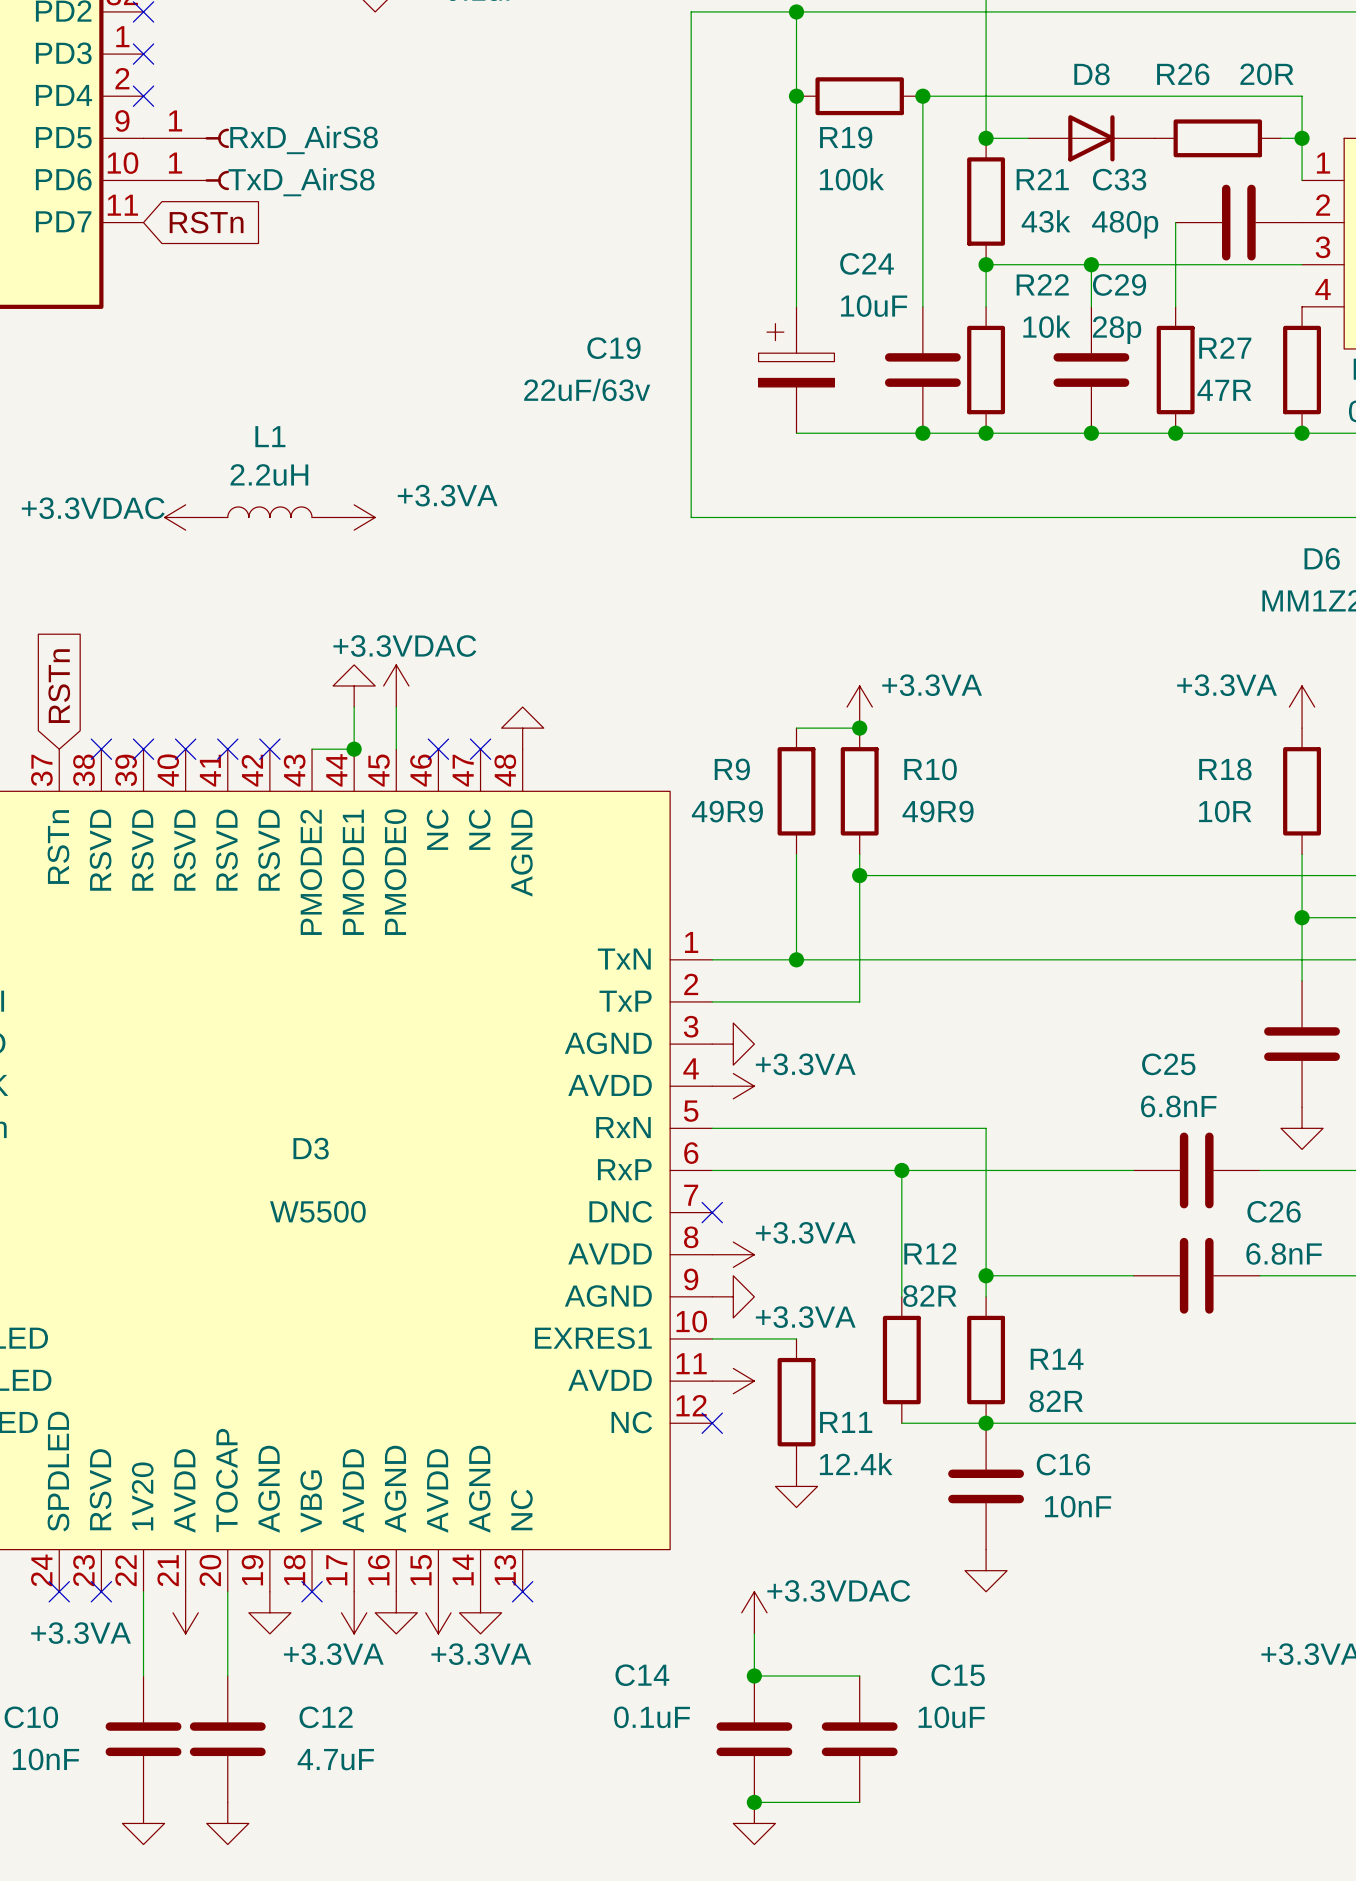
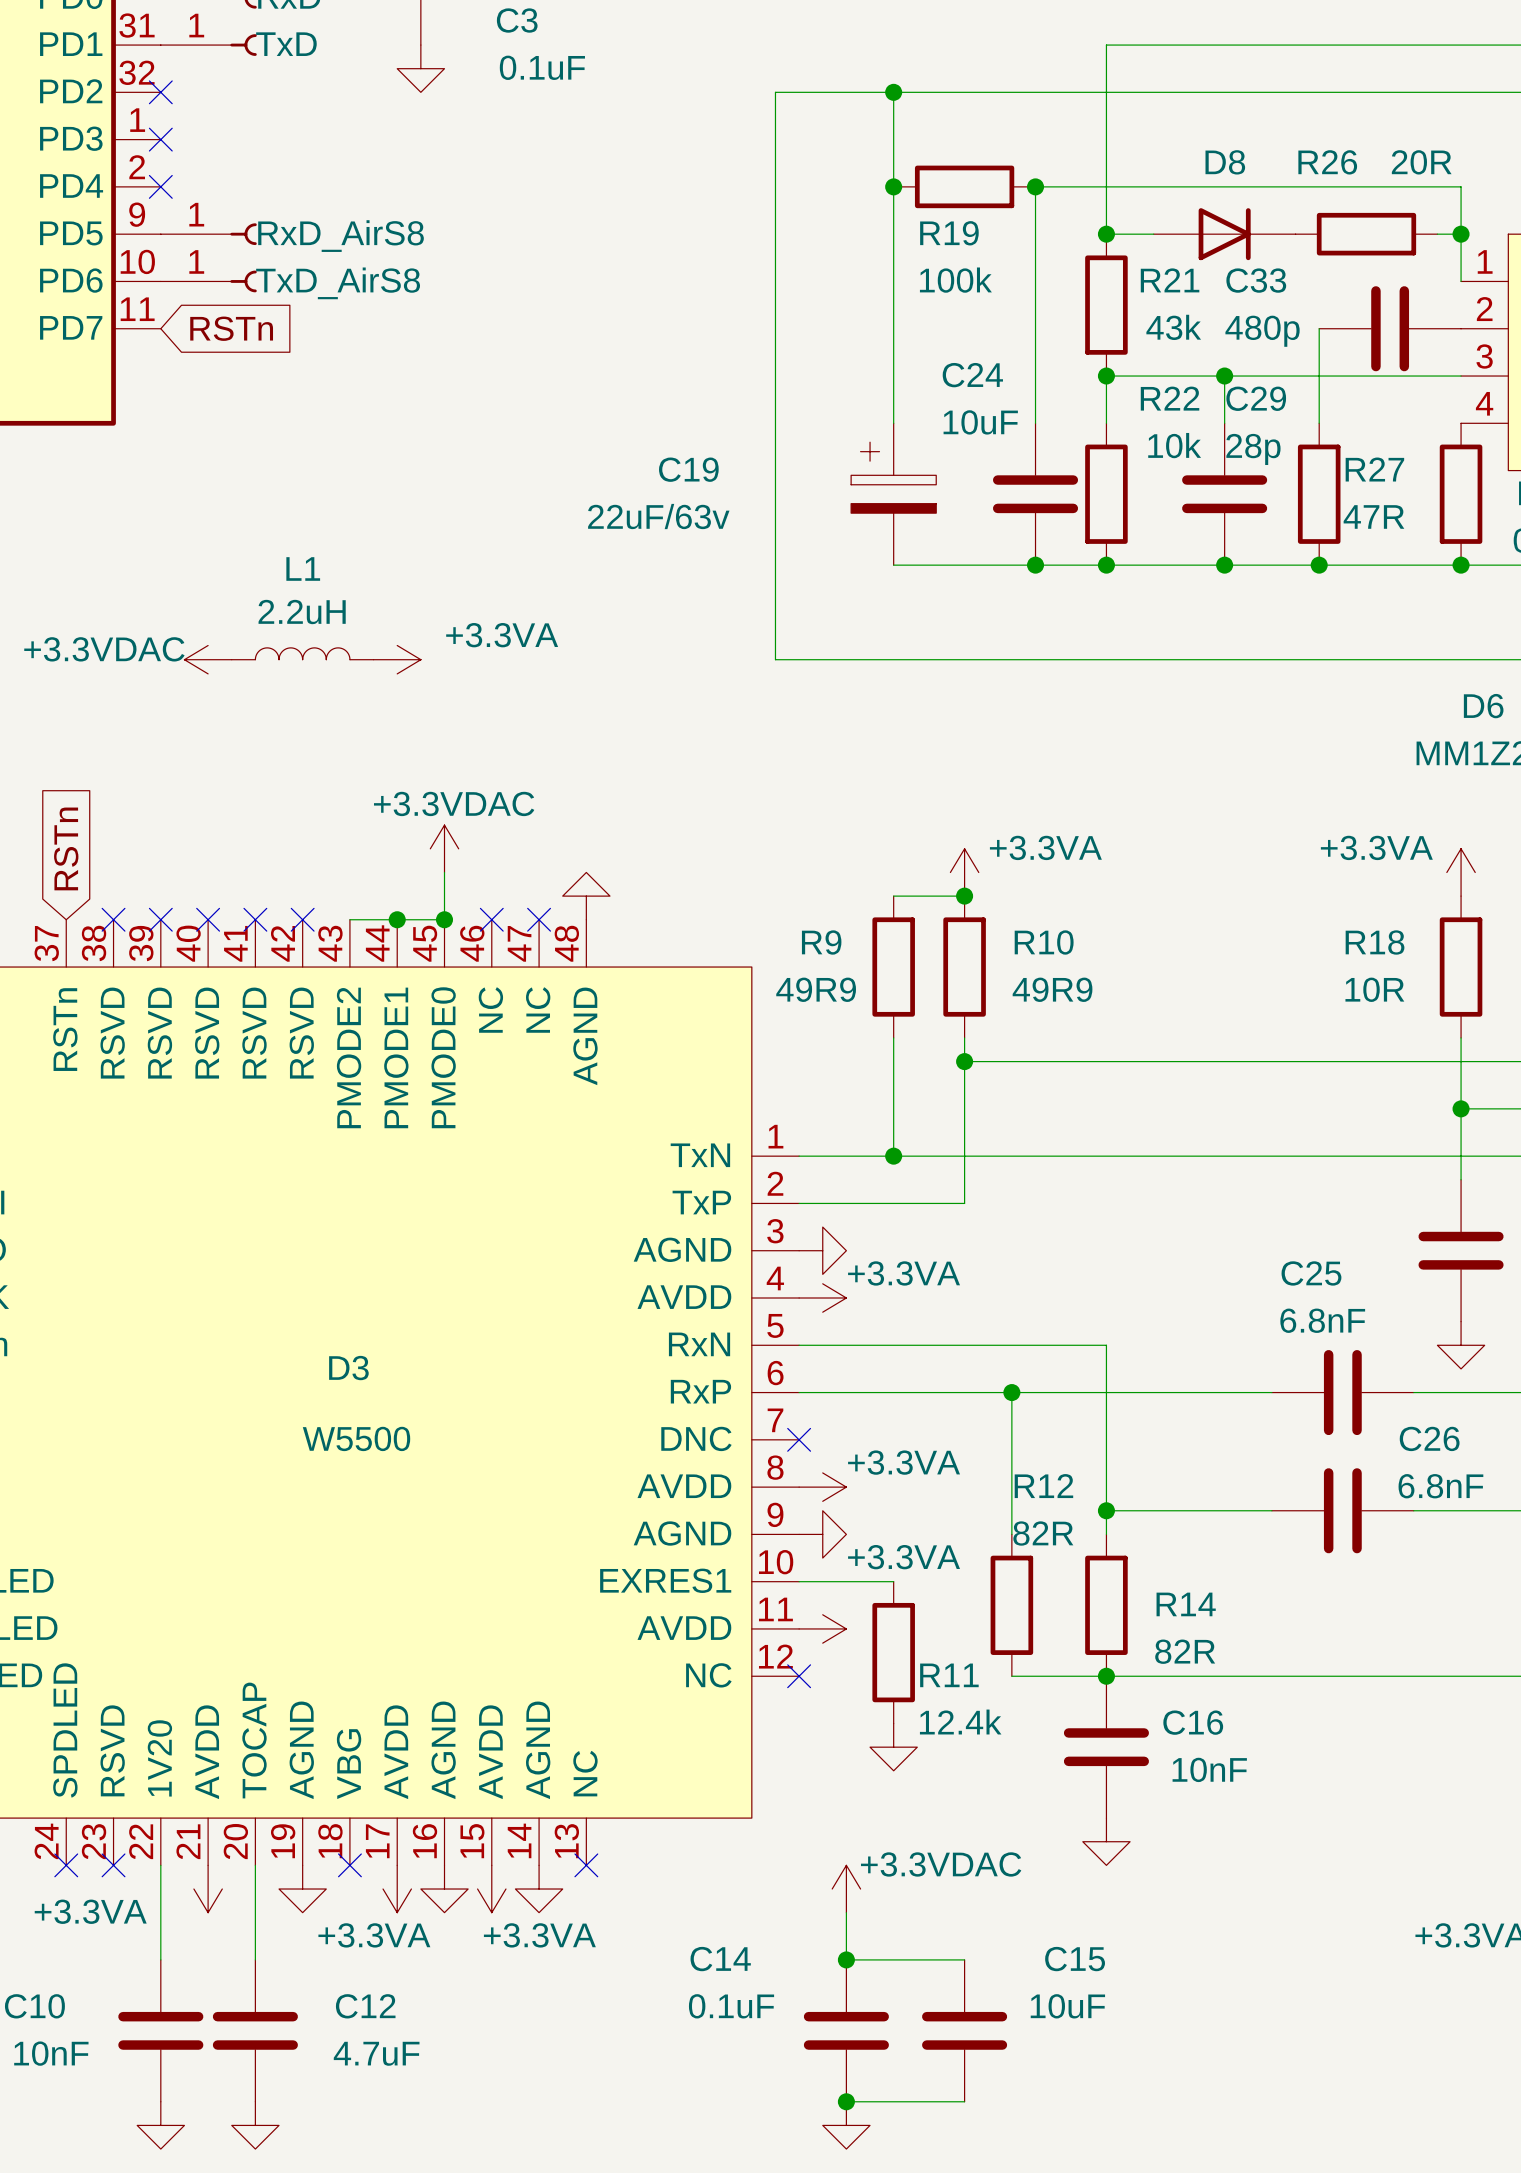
power symbol: (354, 685) -> none
wire: (354, 707) (354, 749) -> (444, 919) (397, 919)
junction: none -> (444, 919)

